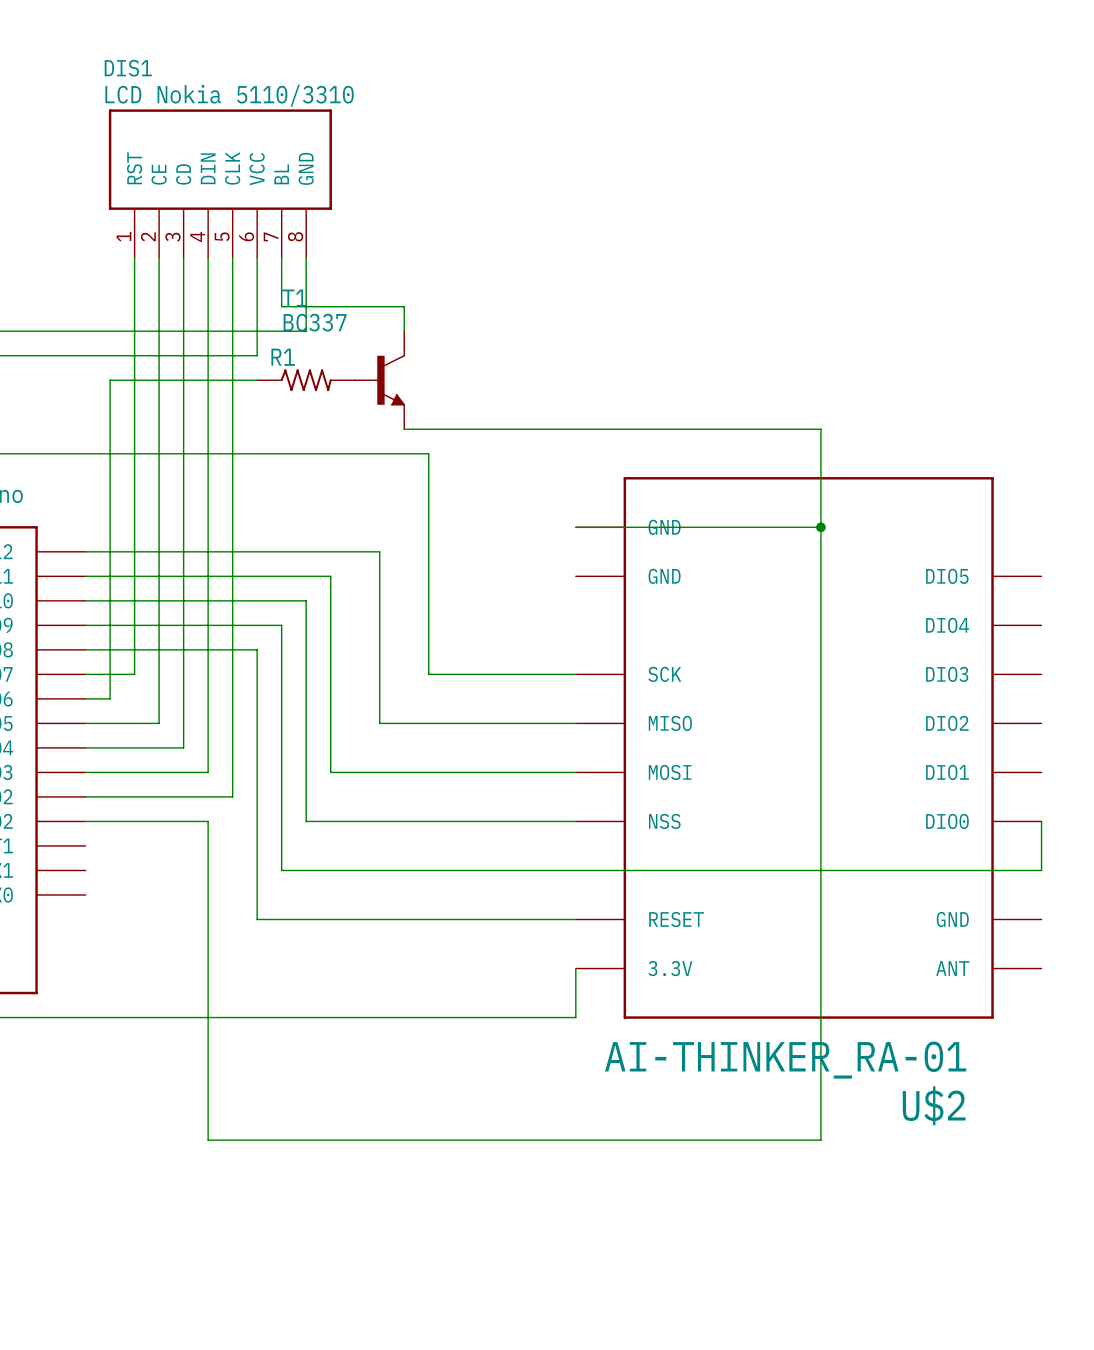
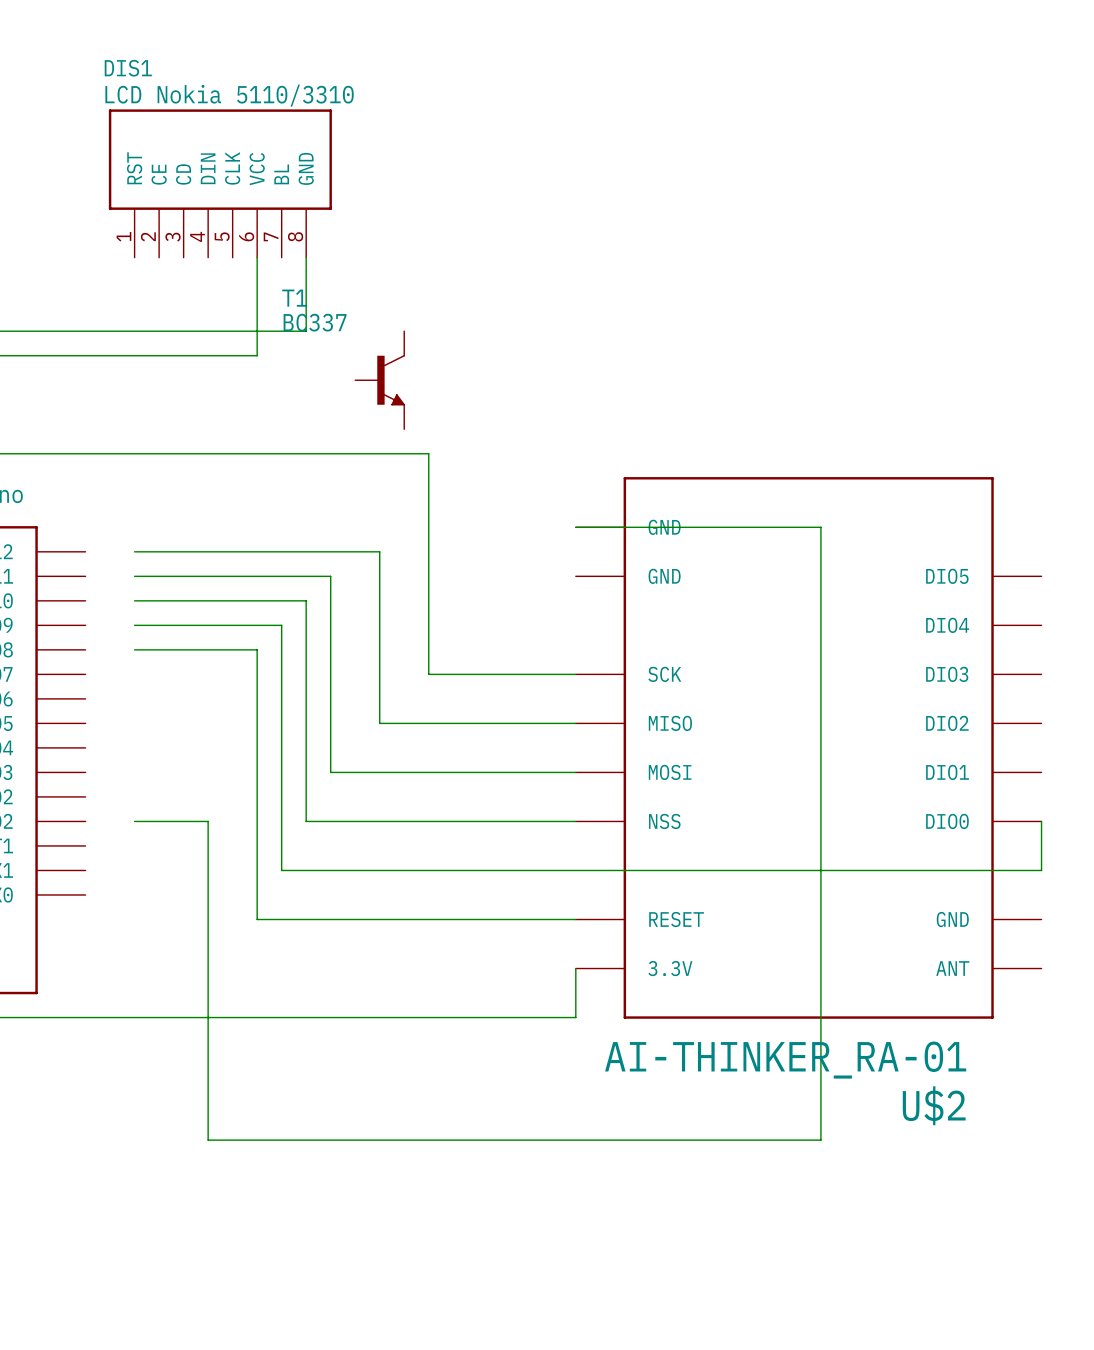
wire: (134, 257) (134, 674) (85, 674) -> none
wire: (159, 257) (159, 723) (85, 723) -> none
wire: (183, 257) (183, 747) (85, 747) -> none
wire: (208, 257) (208, 772) (85, 772) -> none
wire: (232, 257) (232, 796) (85, 796) -> none
wire: (281, 257) (281, 306) (404, 306) (404, 331) -> none
wire: (257, 380) (110, 380) (110, 698) (85, 698) -> none
R1: (306, 380) -> none
wire: (404, 429) (820, 429) (820, 527) -> none
junction: (820, 527) -> none
wire: (85, 551) (134, 551) -> none
wire: (85, 576) (134, 576) -> none
wire: (85, 600) (134, 600) -> none
wire: (85, 625) (134, 625) -> none
wire: (85, 649) (134, 649) -> none
wire: (85, 821) (134, 821) -> none

